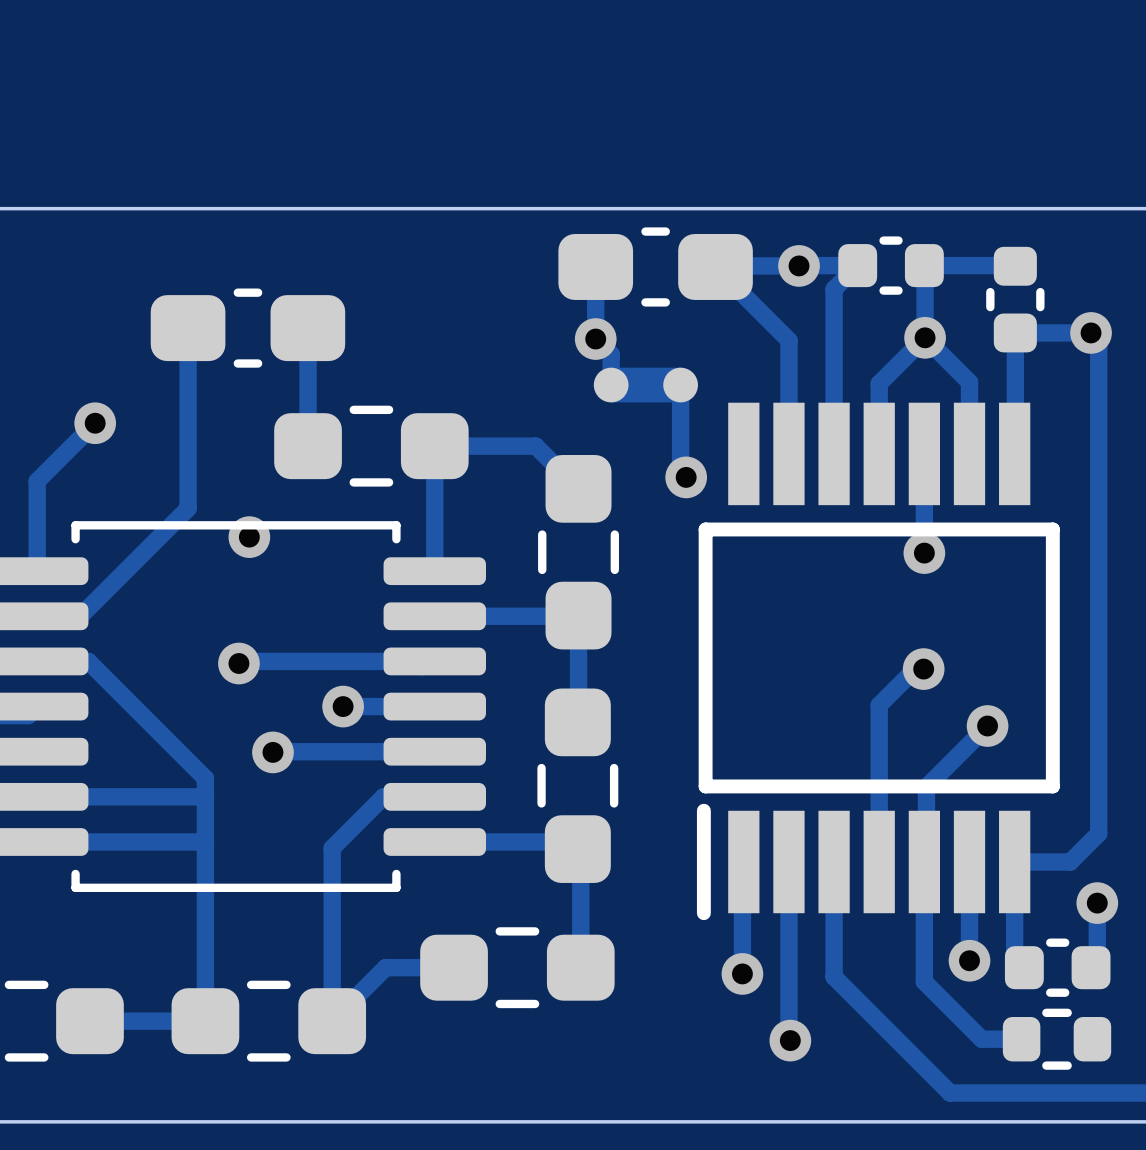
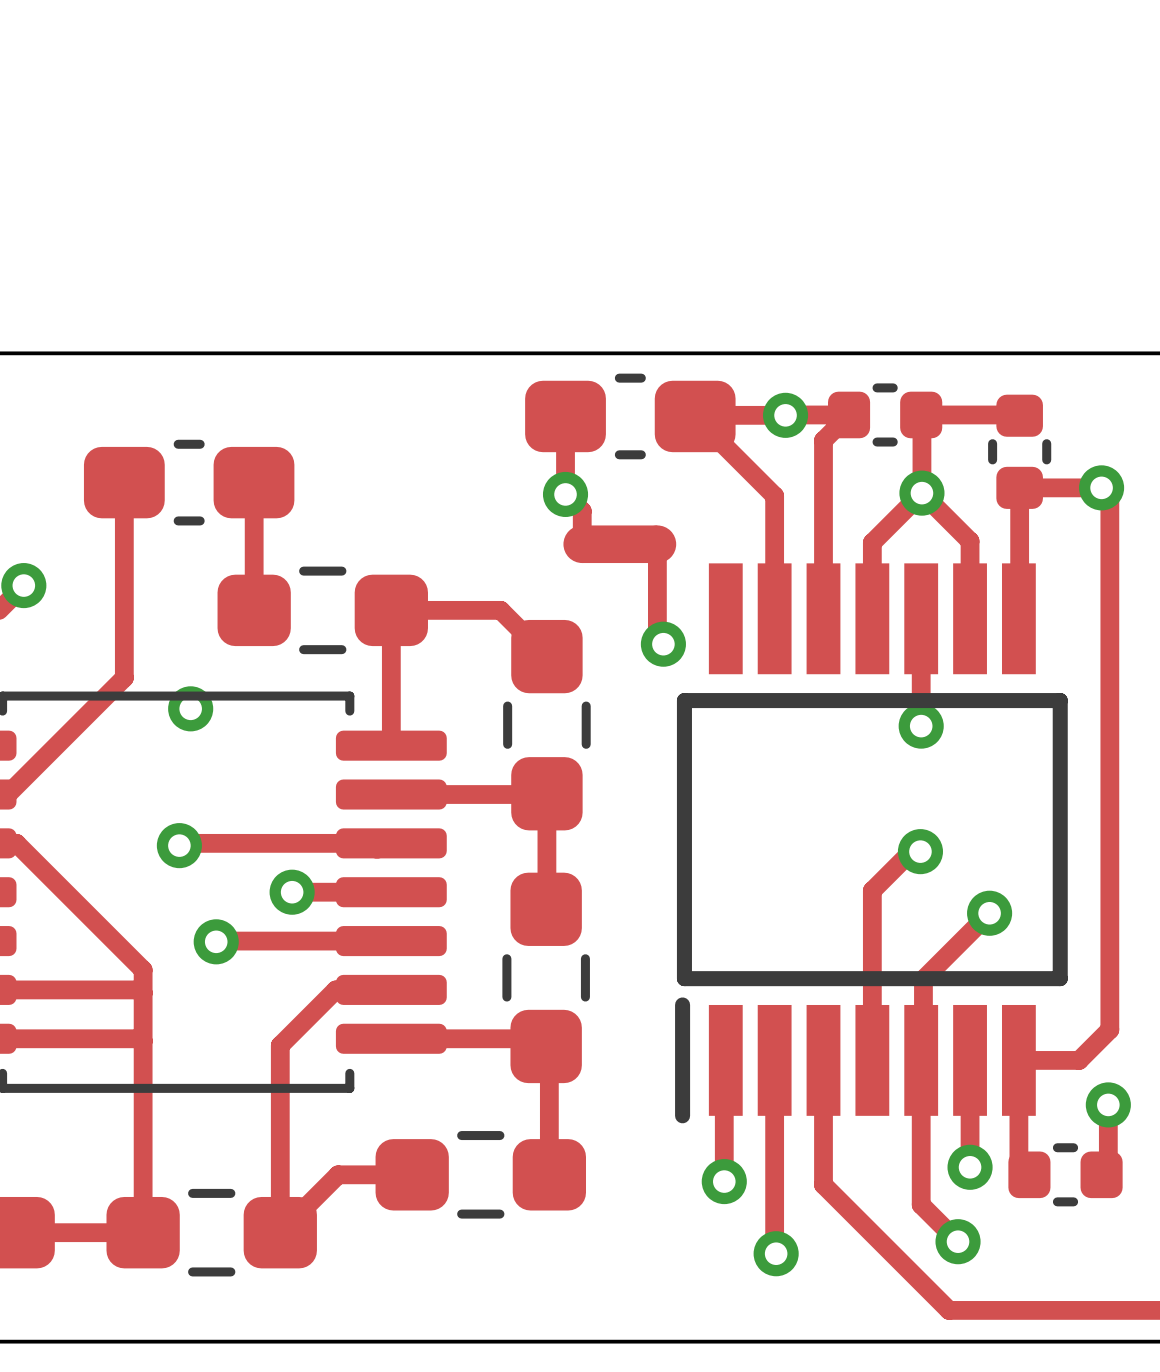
track: (924, 981) (981, 1039) (1021, 1039) -> (921, 1190) (921, 1204) (958, 1241)
via: none -> (958, 1241)
part: (1057, 1039) -> none

